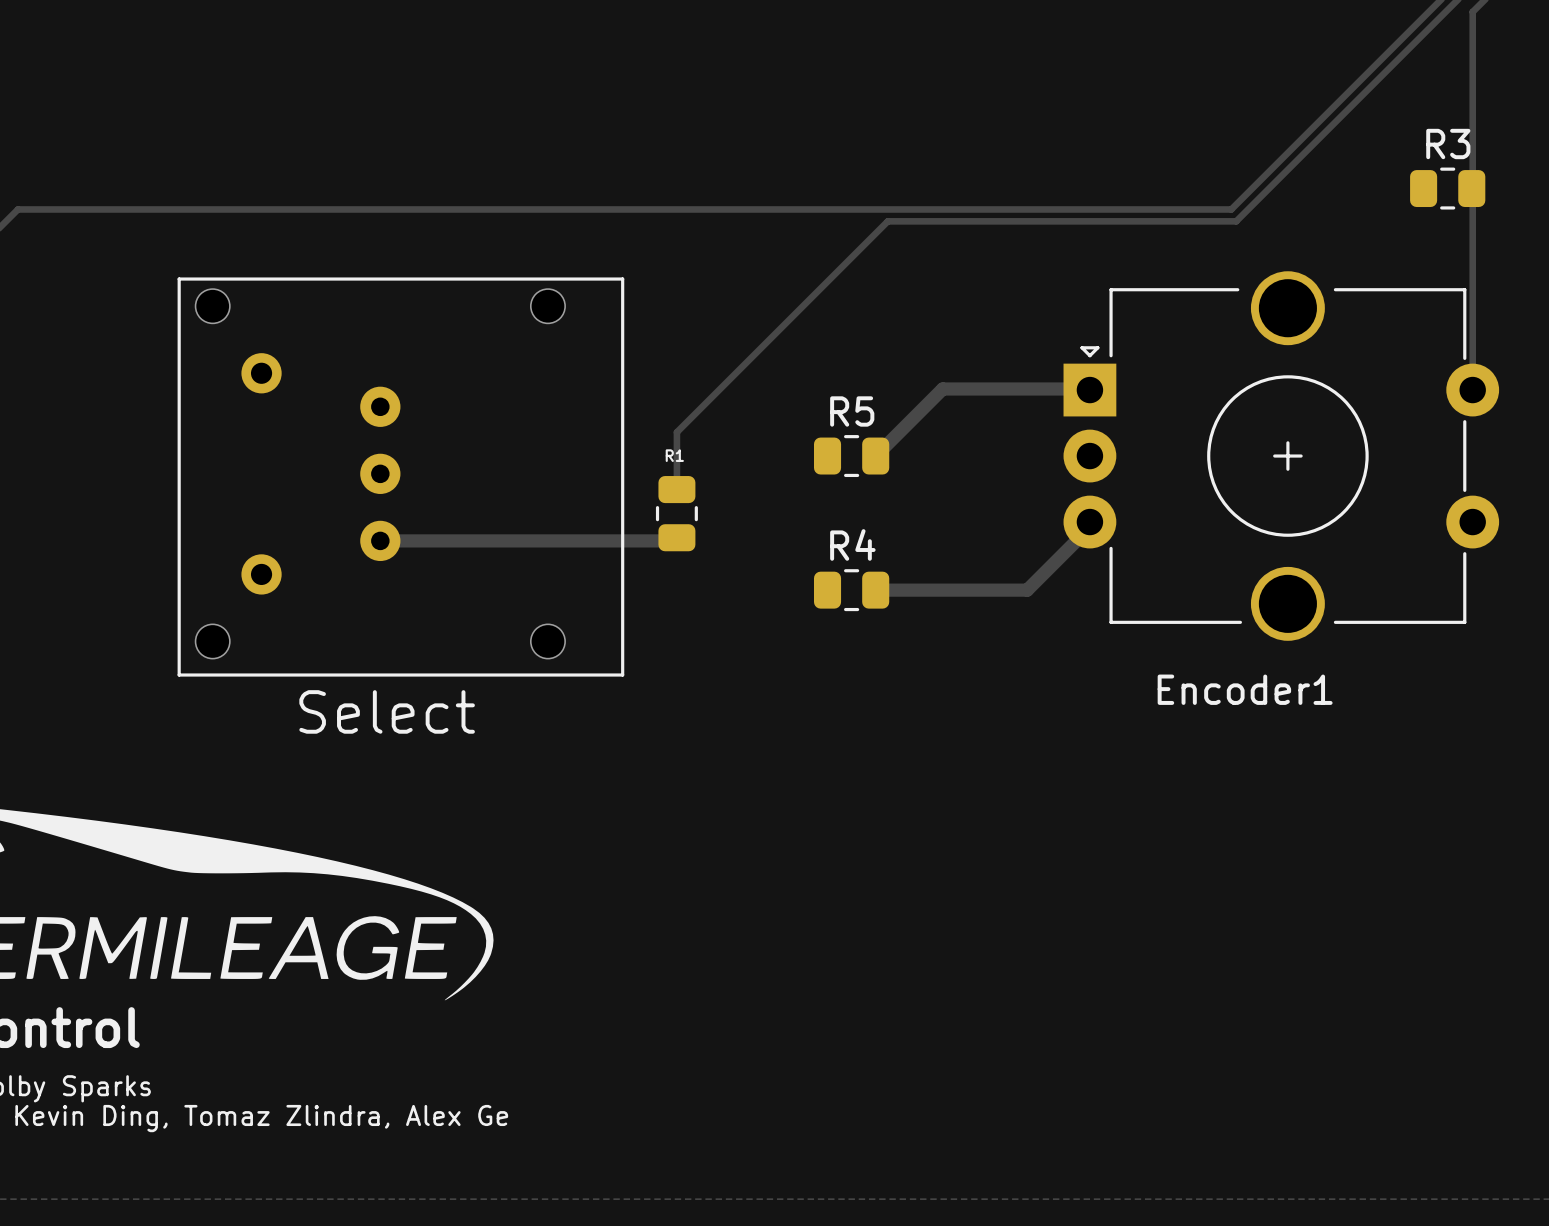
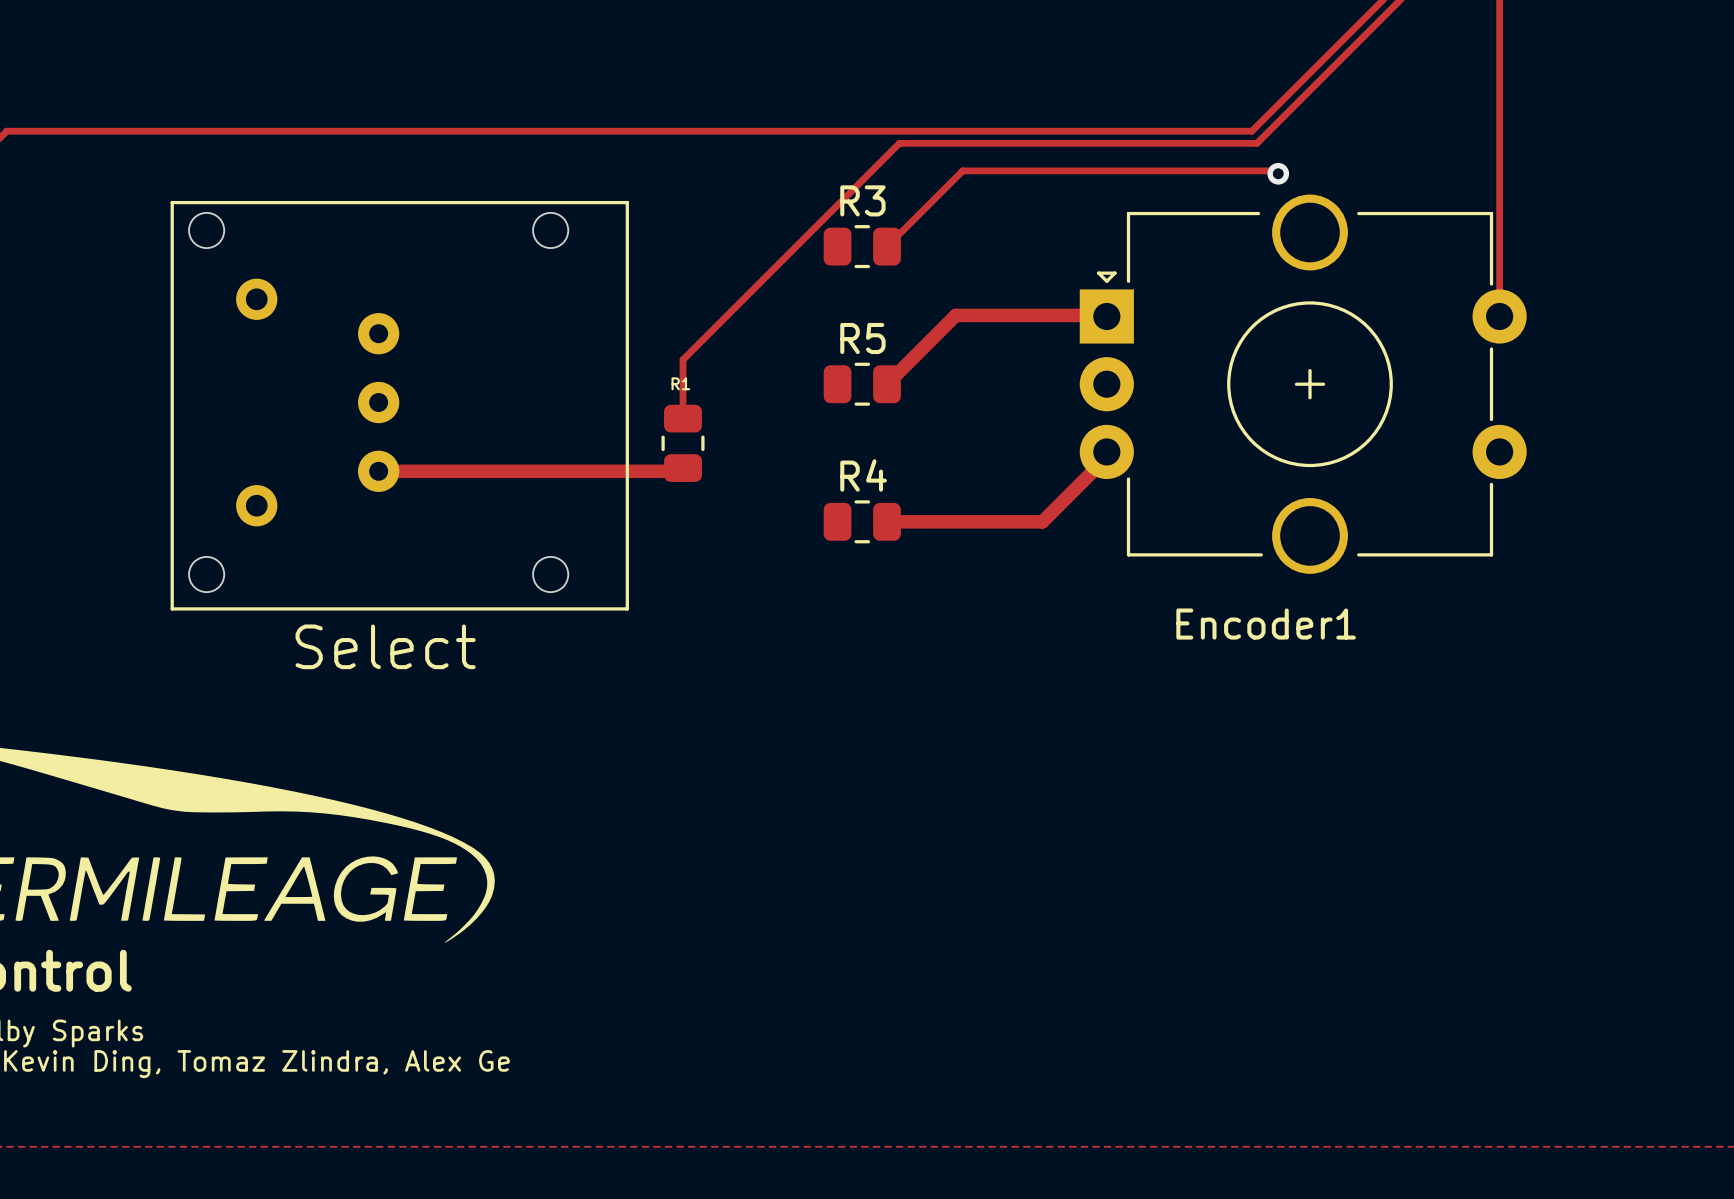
R3 position: (1447, 188) -> (862, 246)
track: none -> (1278, 173) (1275, 170) (962, 170) (886, 246)
via: none -> (1278, 173)

